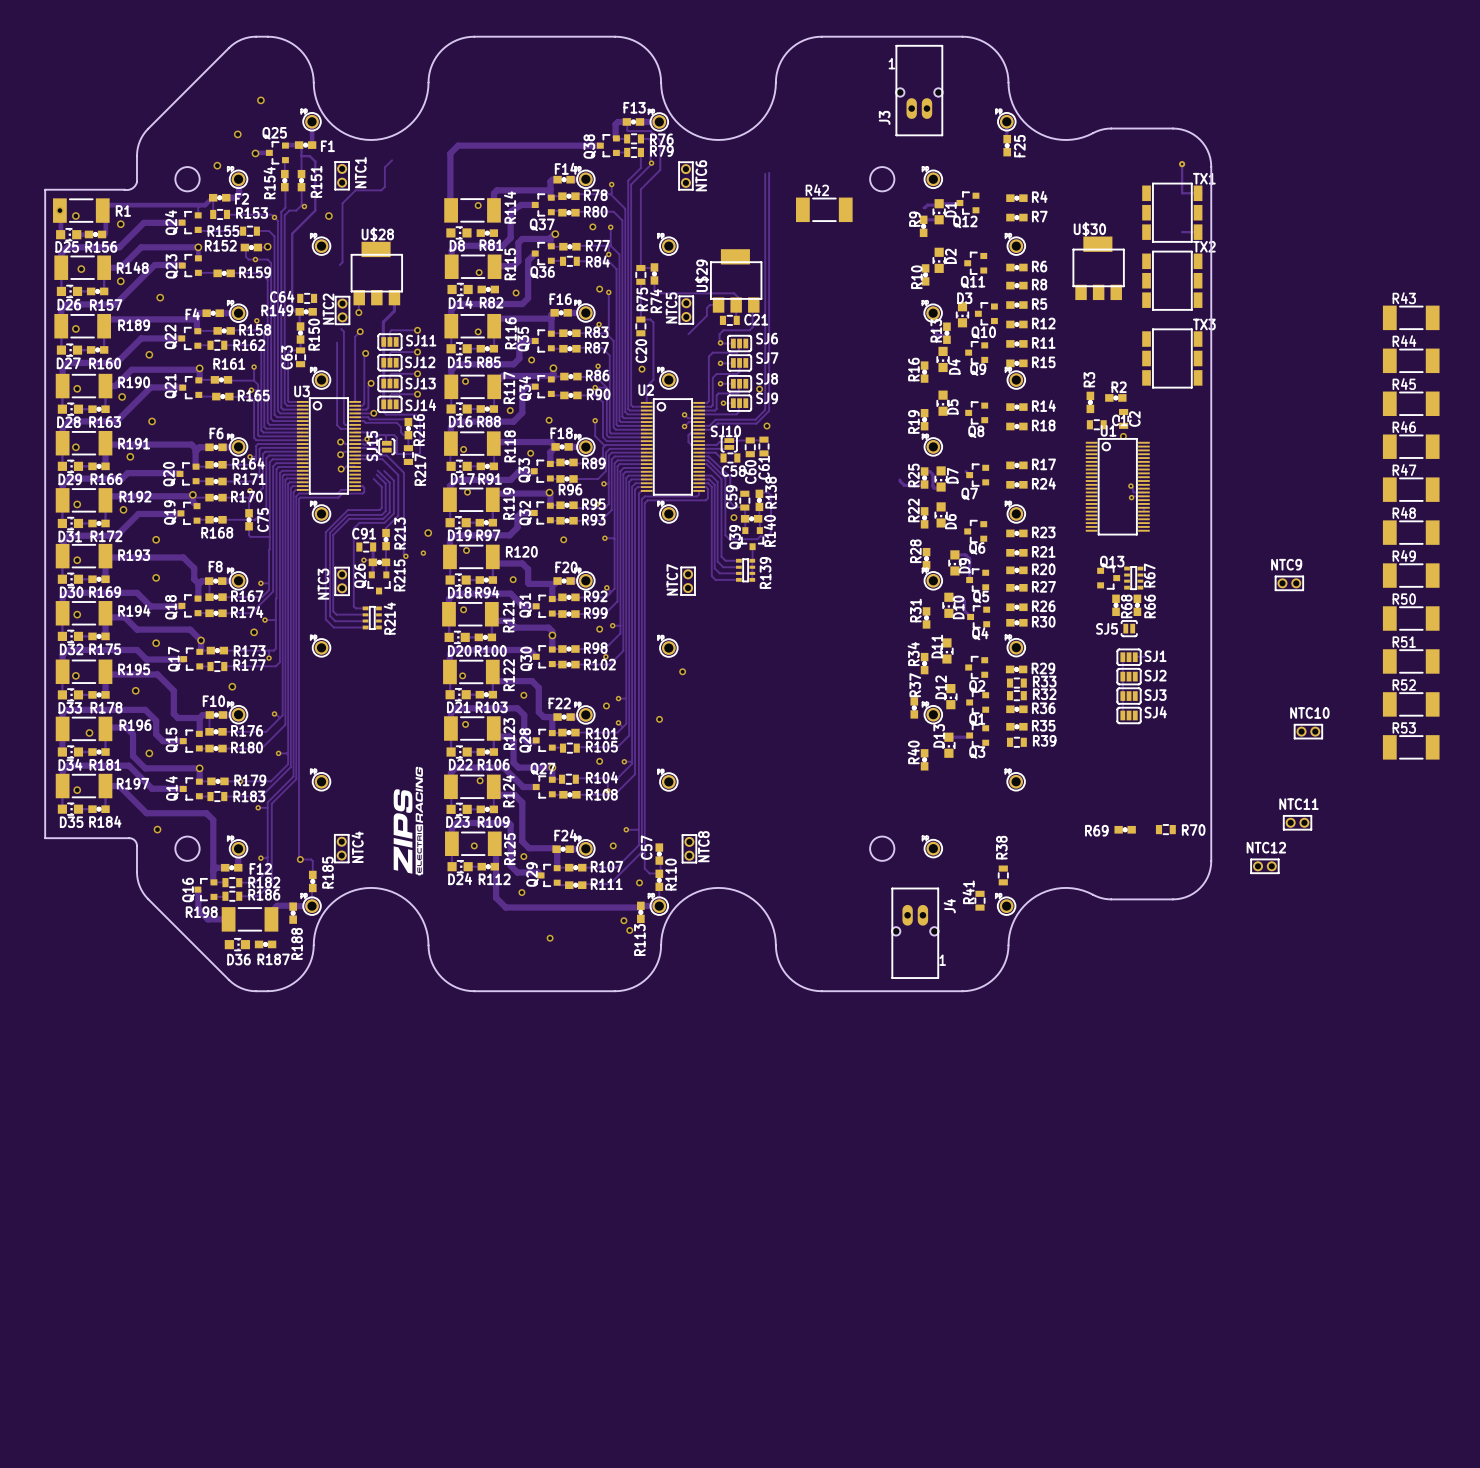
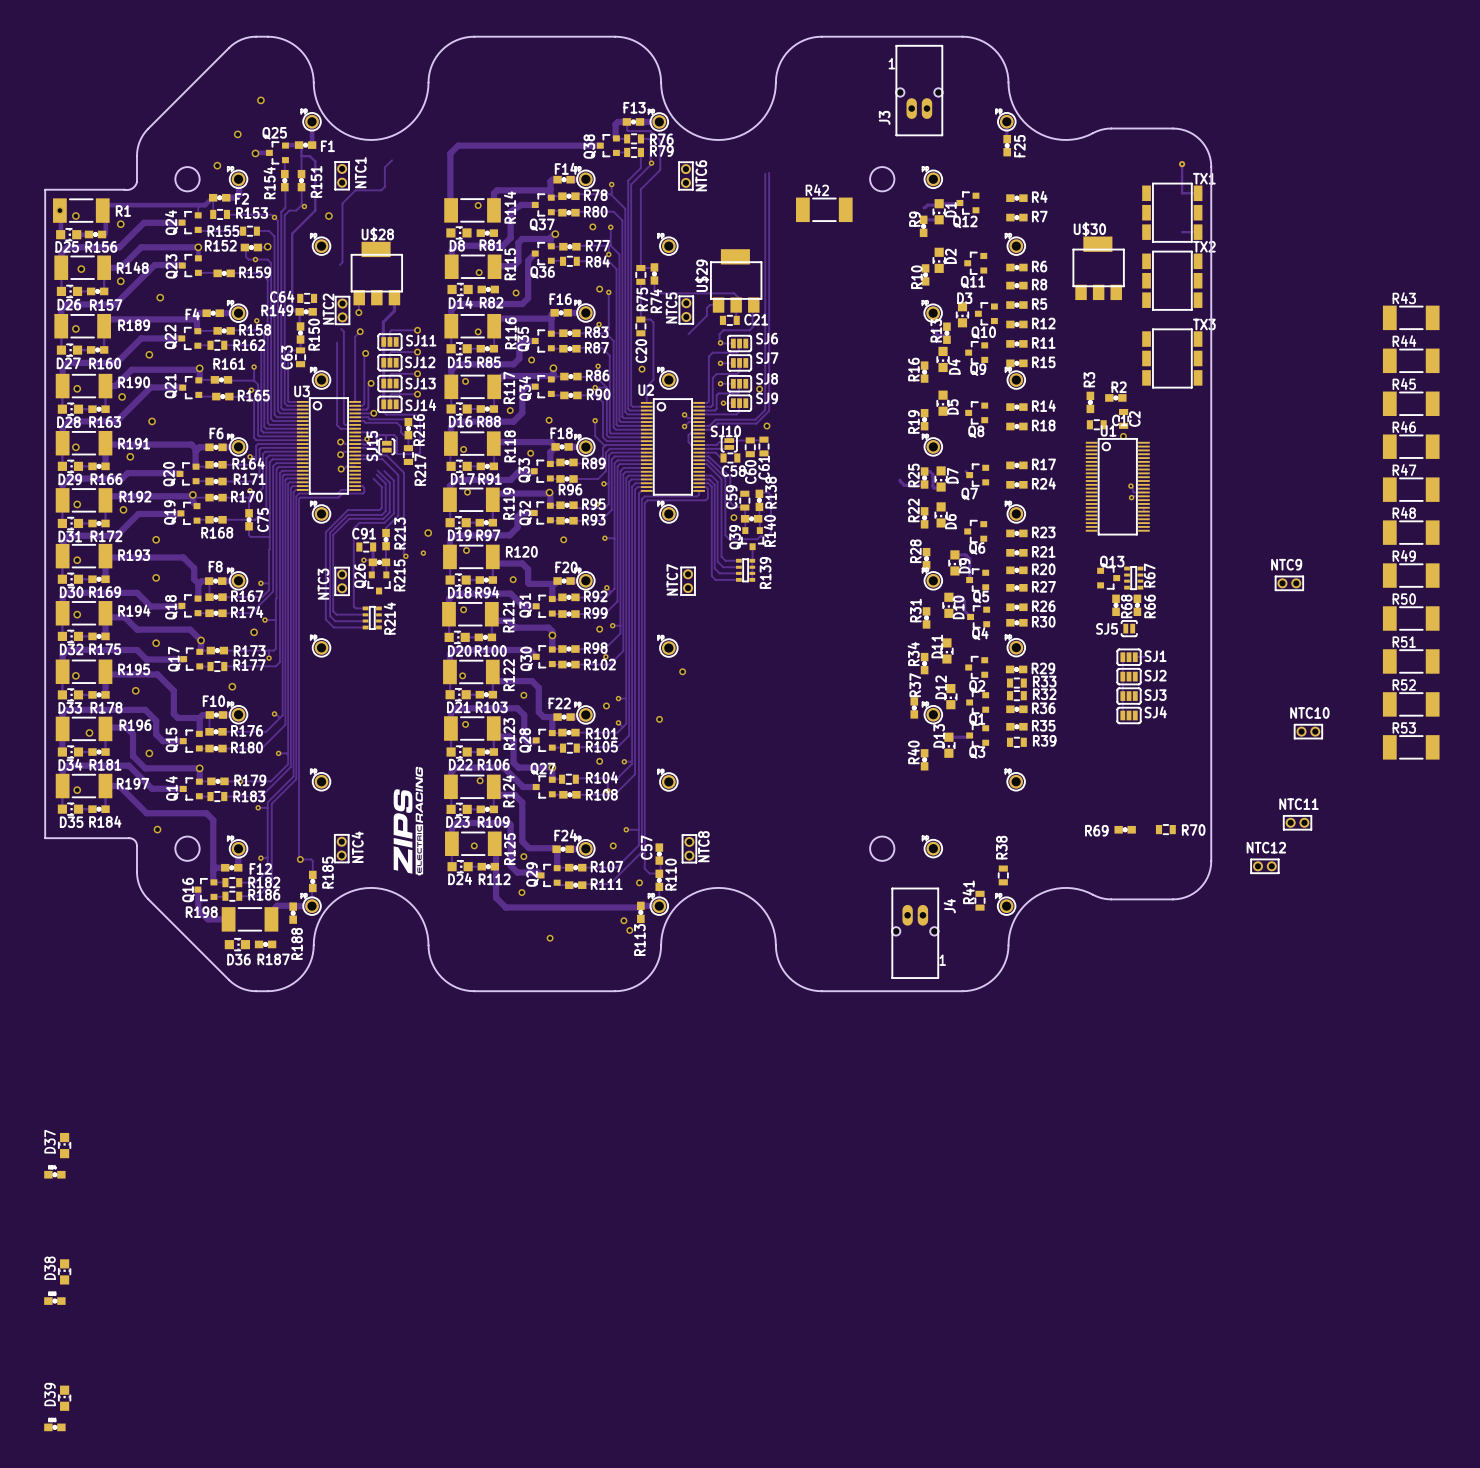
D37: none -> (64, 1145)
part: none -> (54, 1174)
D38: none -> (64, 1271)
part: none -> (54, 1301)
D39: none -> (64, 1398)
part: none -> (54, 1427)

